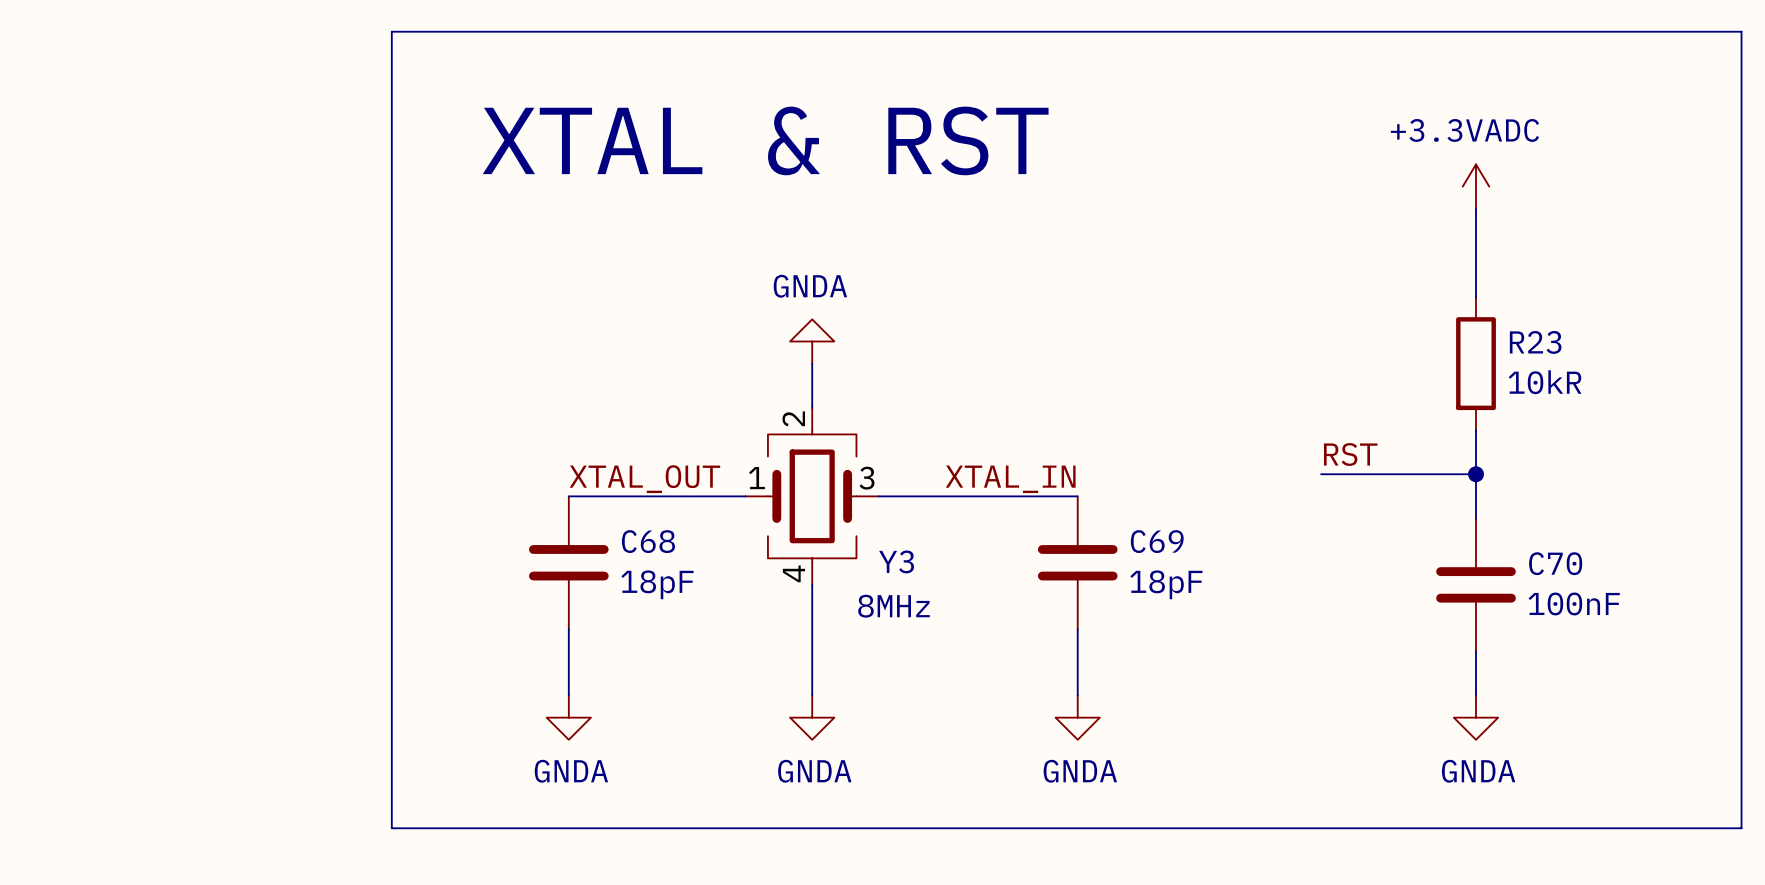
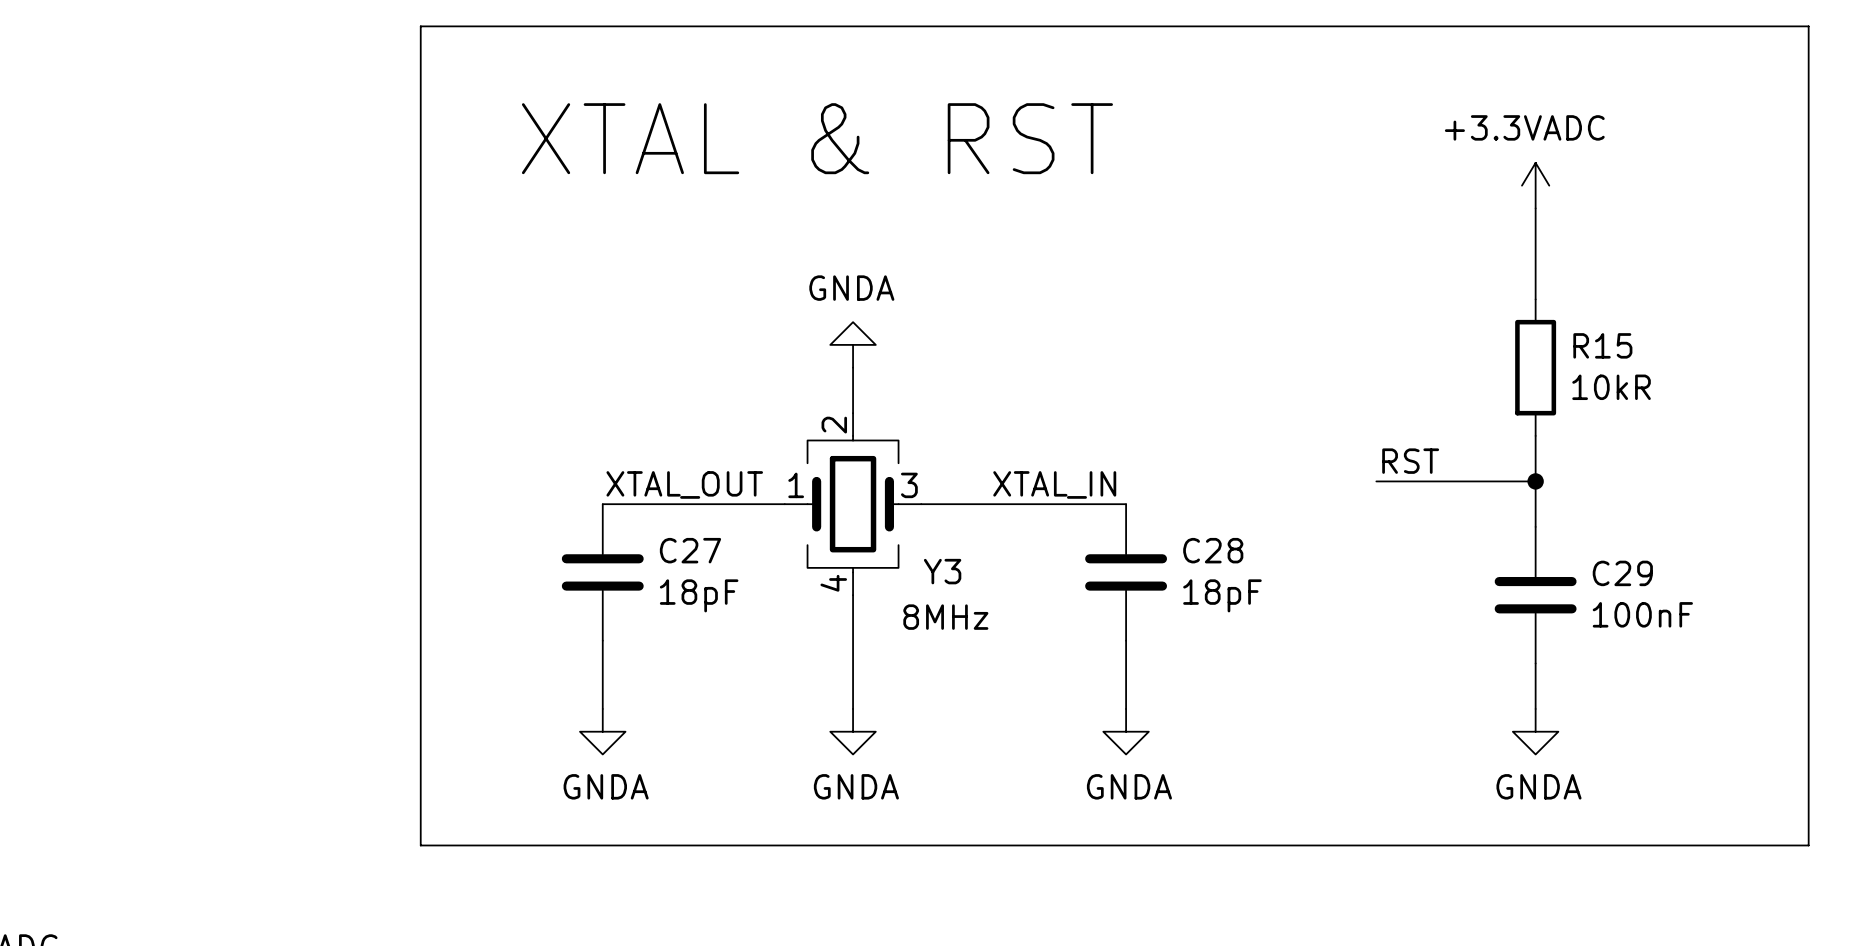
R23 name: R23 (1535, 342) -> R15 (1602, 345)
C68 name: C68 (648, 541) -> C27 (690, 550)
C69 name: C69 (1157, 541) -> C28 (1213, 550)
C70 name: C70 (1555, 563) -> C29 (1622, 573)

